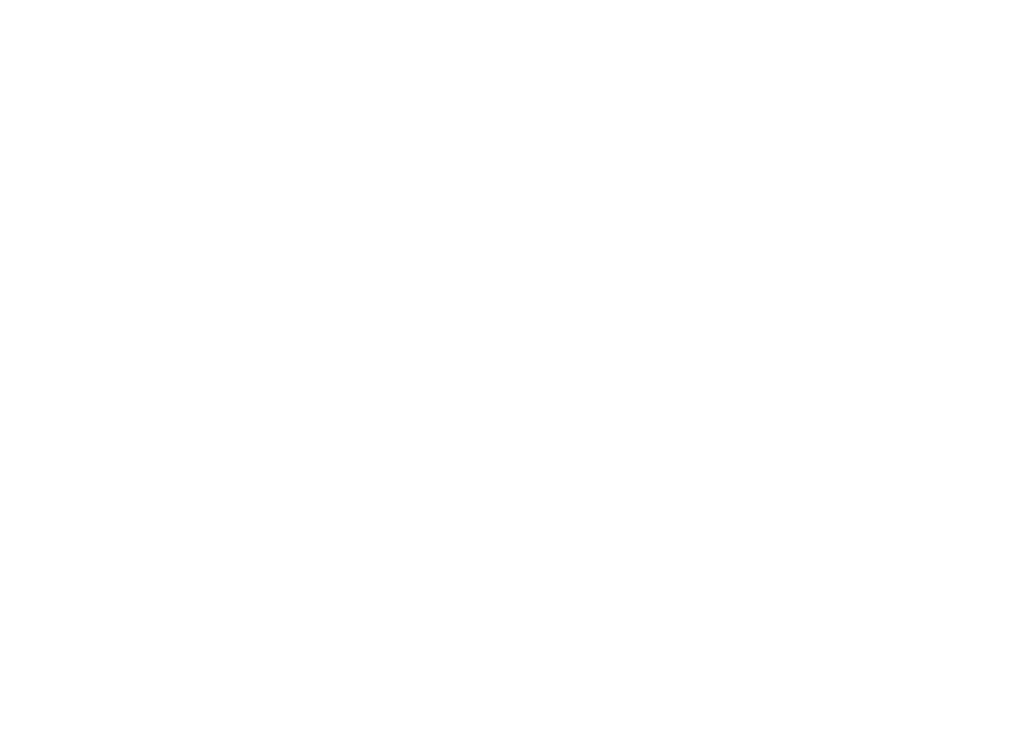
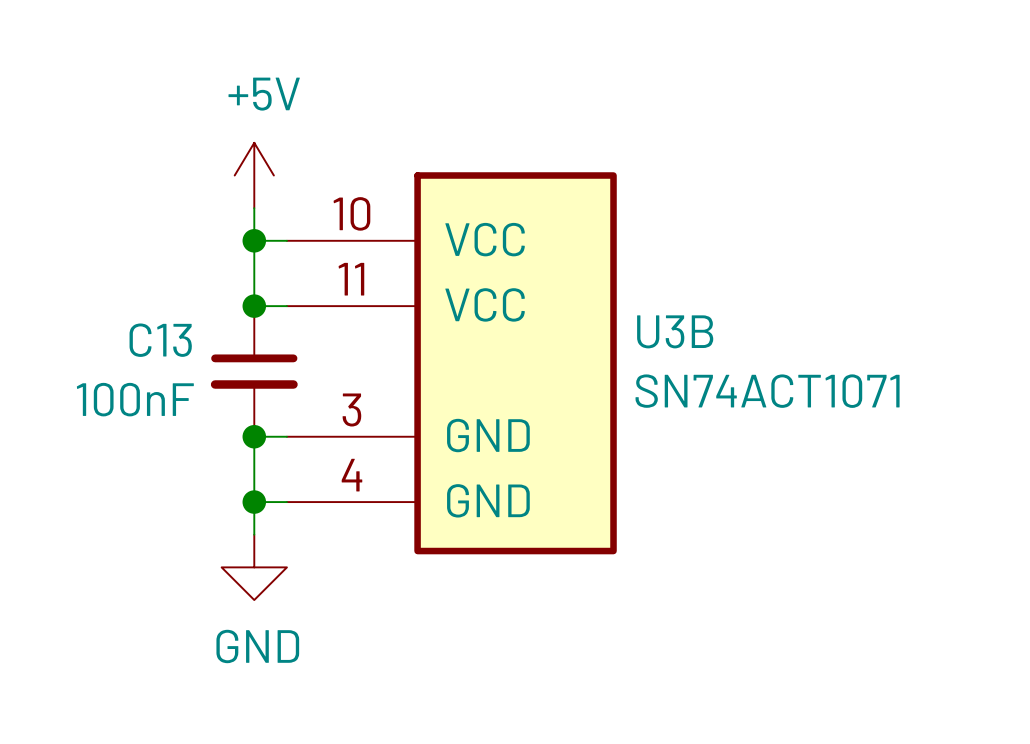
power symbol: none -> +5V (254, 175)
wire: none -> (254, 208) (254, 306) (286, 306)
wire: none -> (254, 240) (286, 240)
junction: none -> (254, 240)
junction: none -> (254, 306)
U3B: none -> SN74ACT1071 (451, 363)
C13: none -> 100nF (254, 371)
junction: none -> (254, 436)
wire: none -> (286, 436) (254, 436) (254, 534)
wire: none -> (254, 502) (286, 502)
junction: none -> (254, 502)
power symbol: none -> GND (254, 567)

